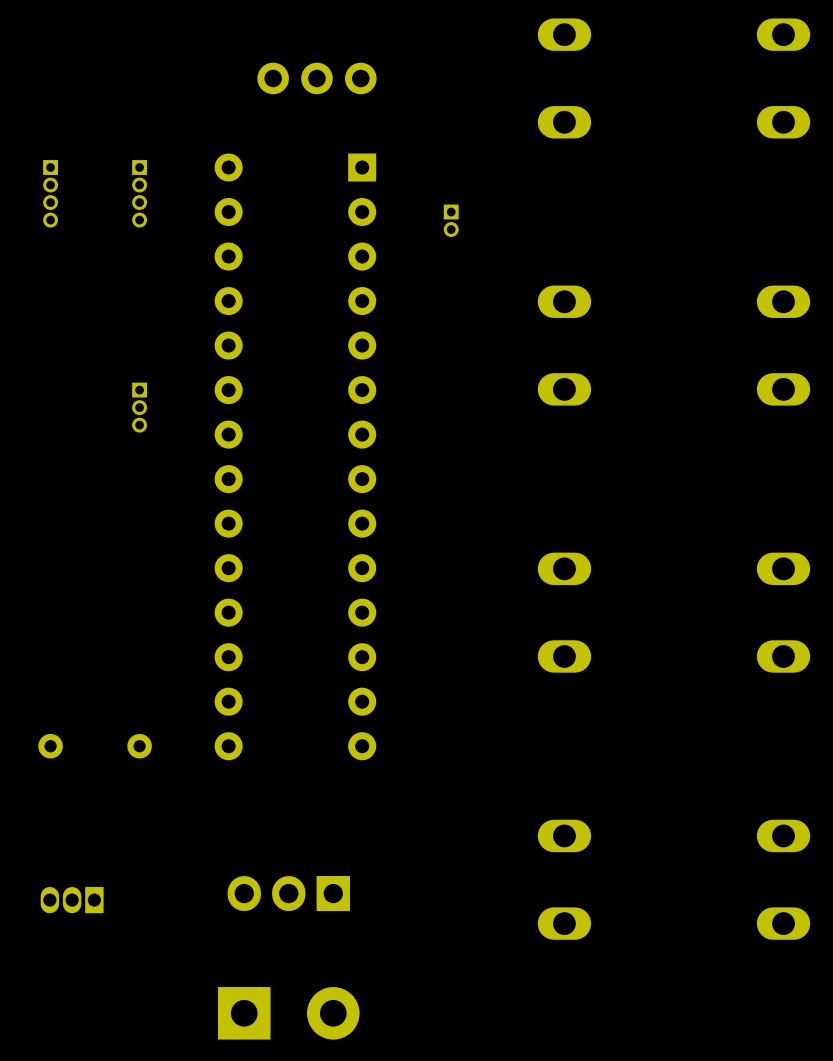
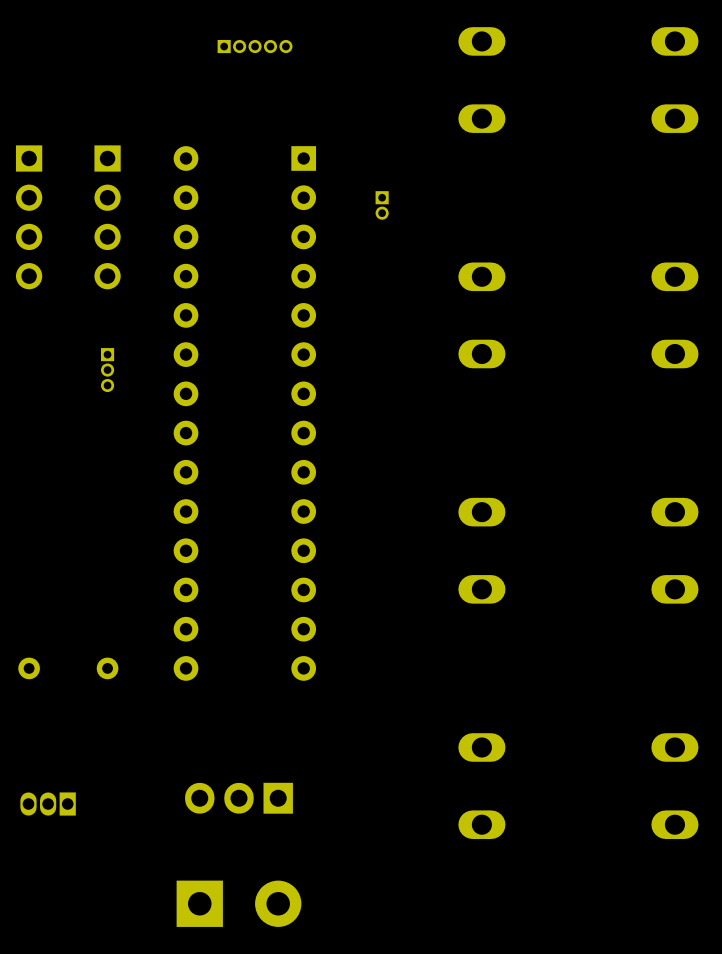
part: none -> (255, 46)
part: (316, 78) -> none
part: (50, 193) -> none
part: (139, 193) -> none
part: none -> (29, 217)
part: none -> (107, 217)

